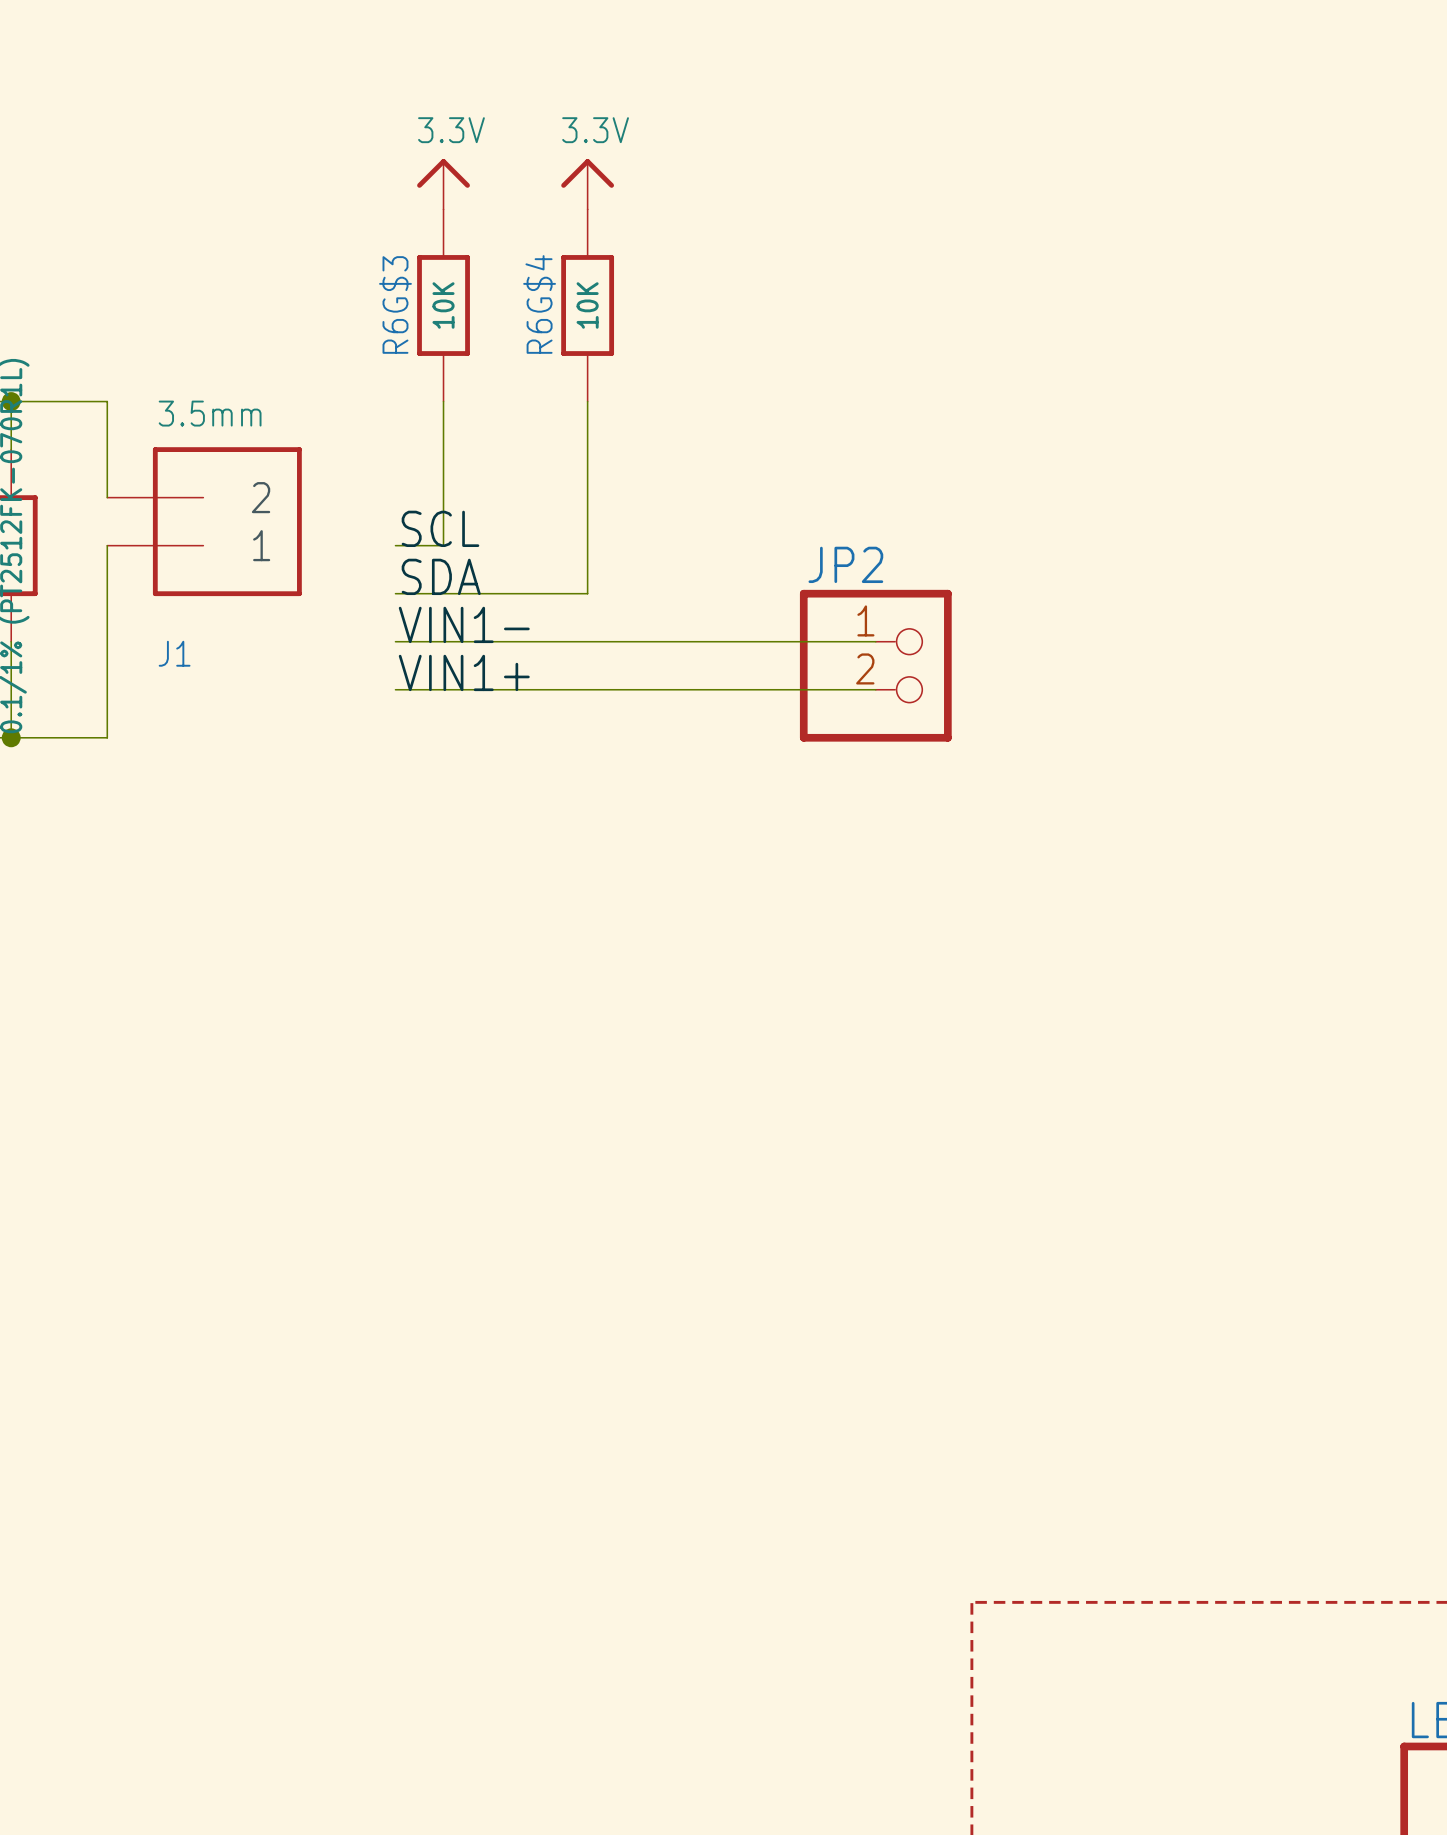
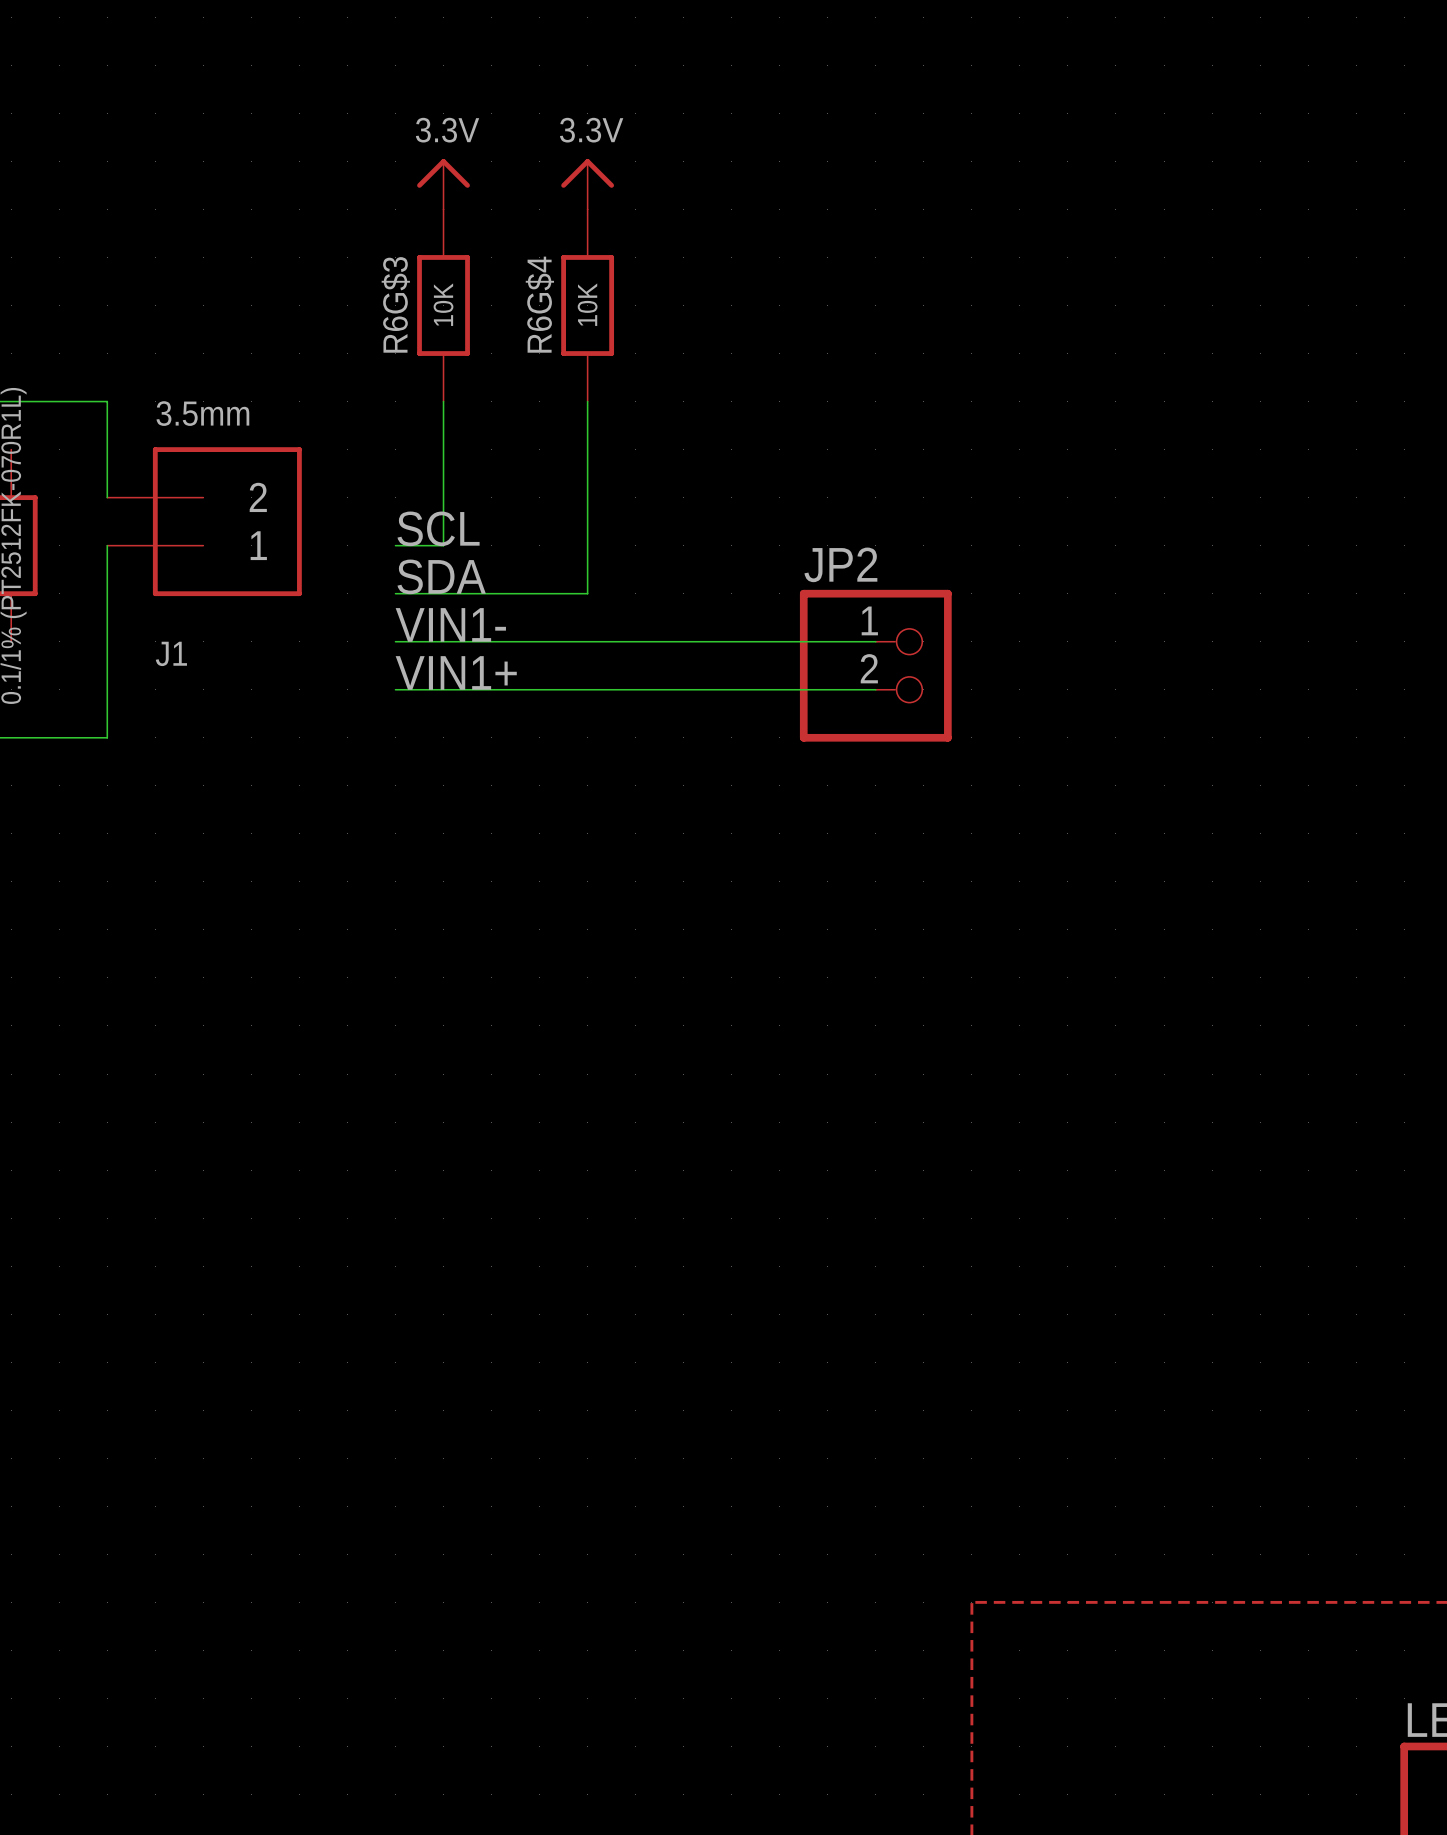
wire: (11, 401) (11, 449) -> none
junction: (11, 401) -> none
wire: (11, 641) (11, 737) -> none
junction: (11, 737) -> none

